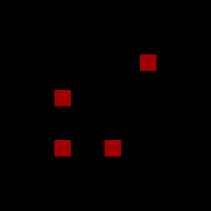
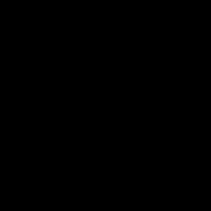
part: (148, 62) -> none
part: (62, 98) -> none
part: (62, 148) -> none
part: (112, 148) -> none

